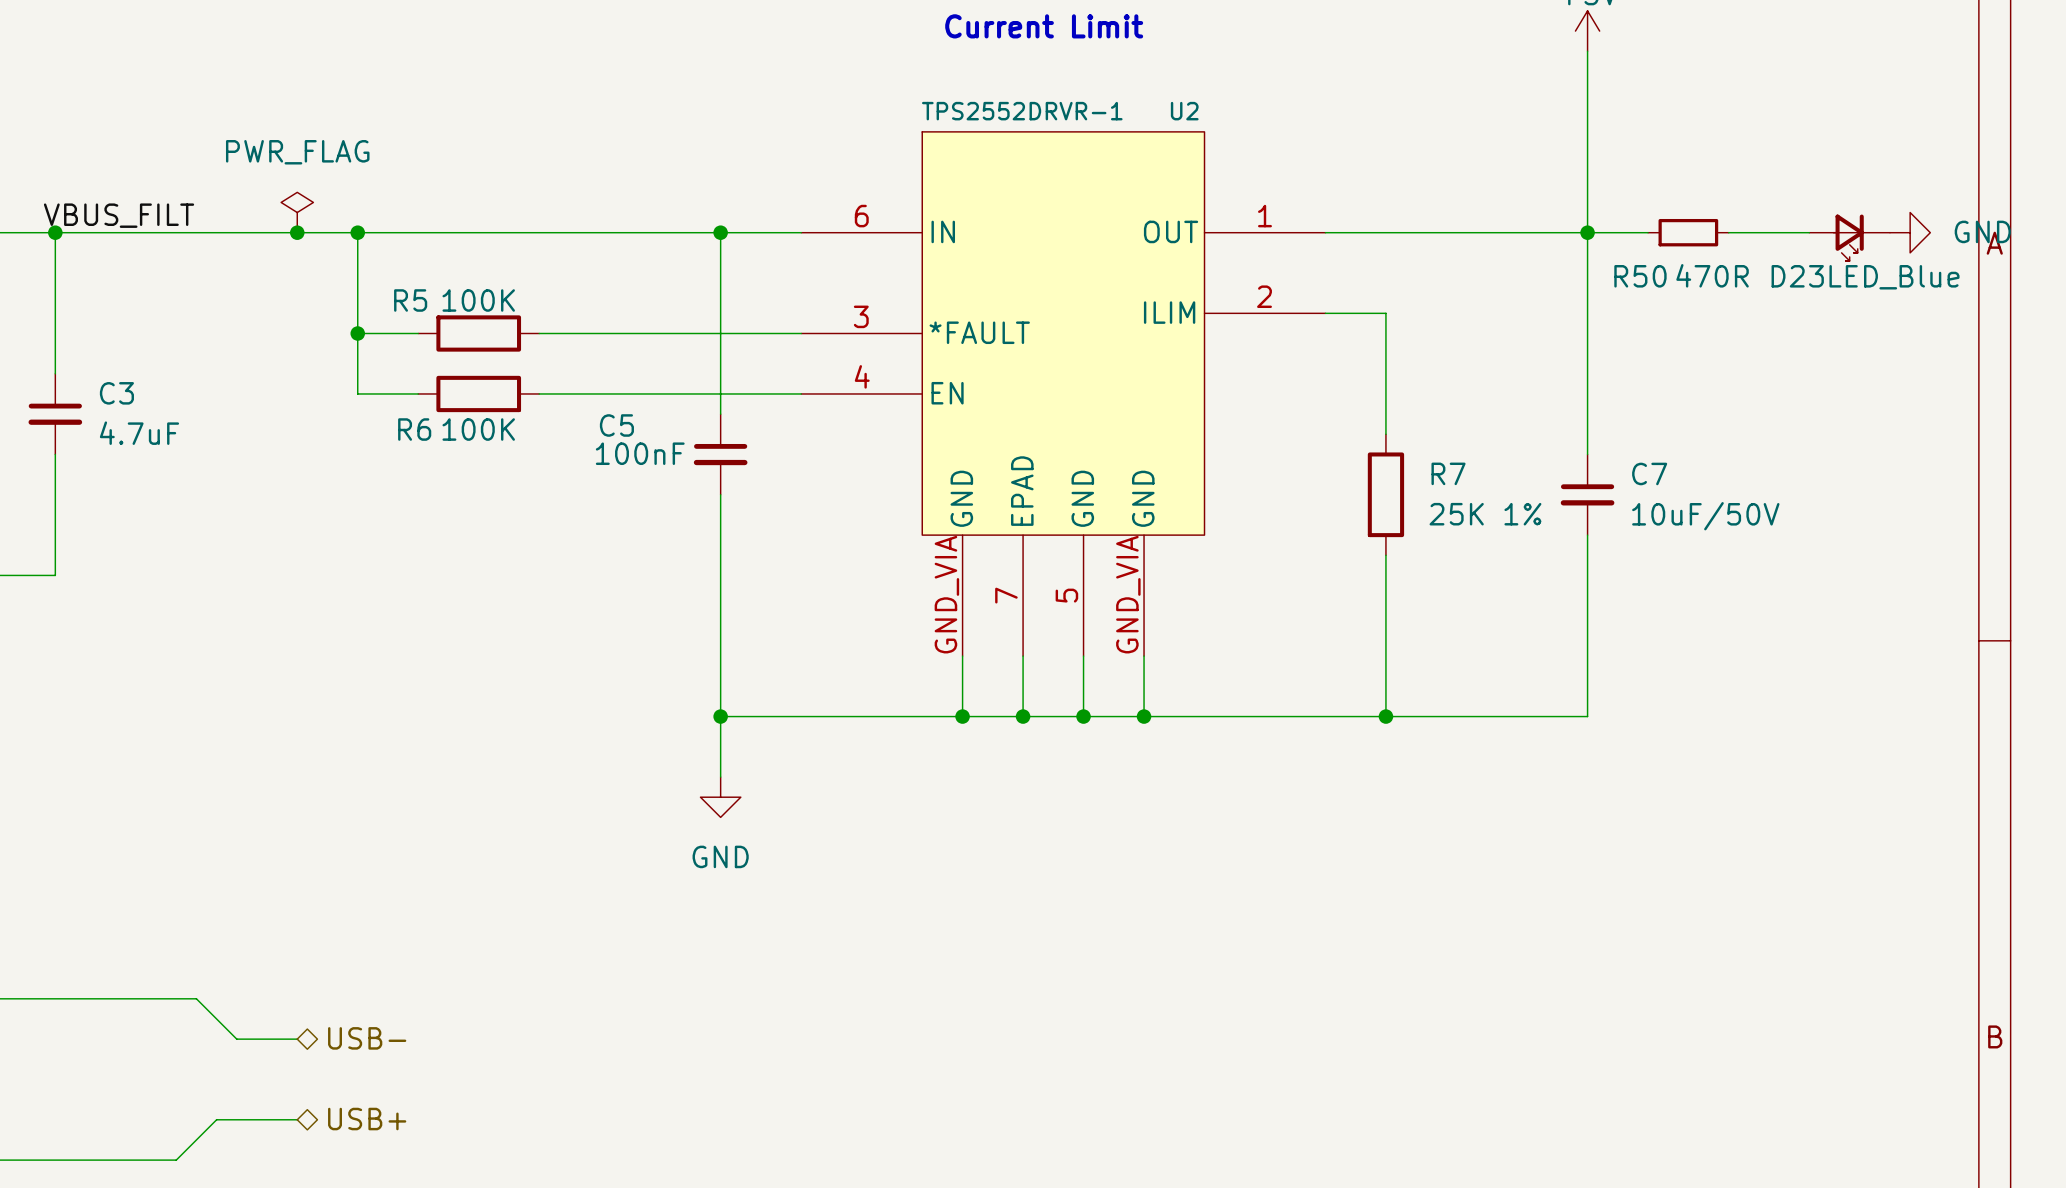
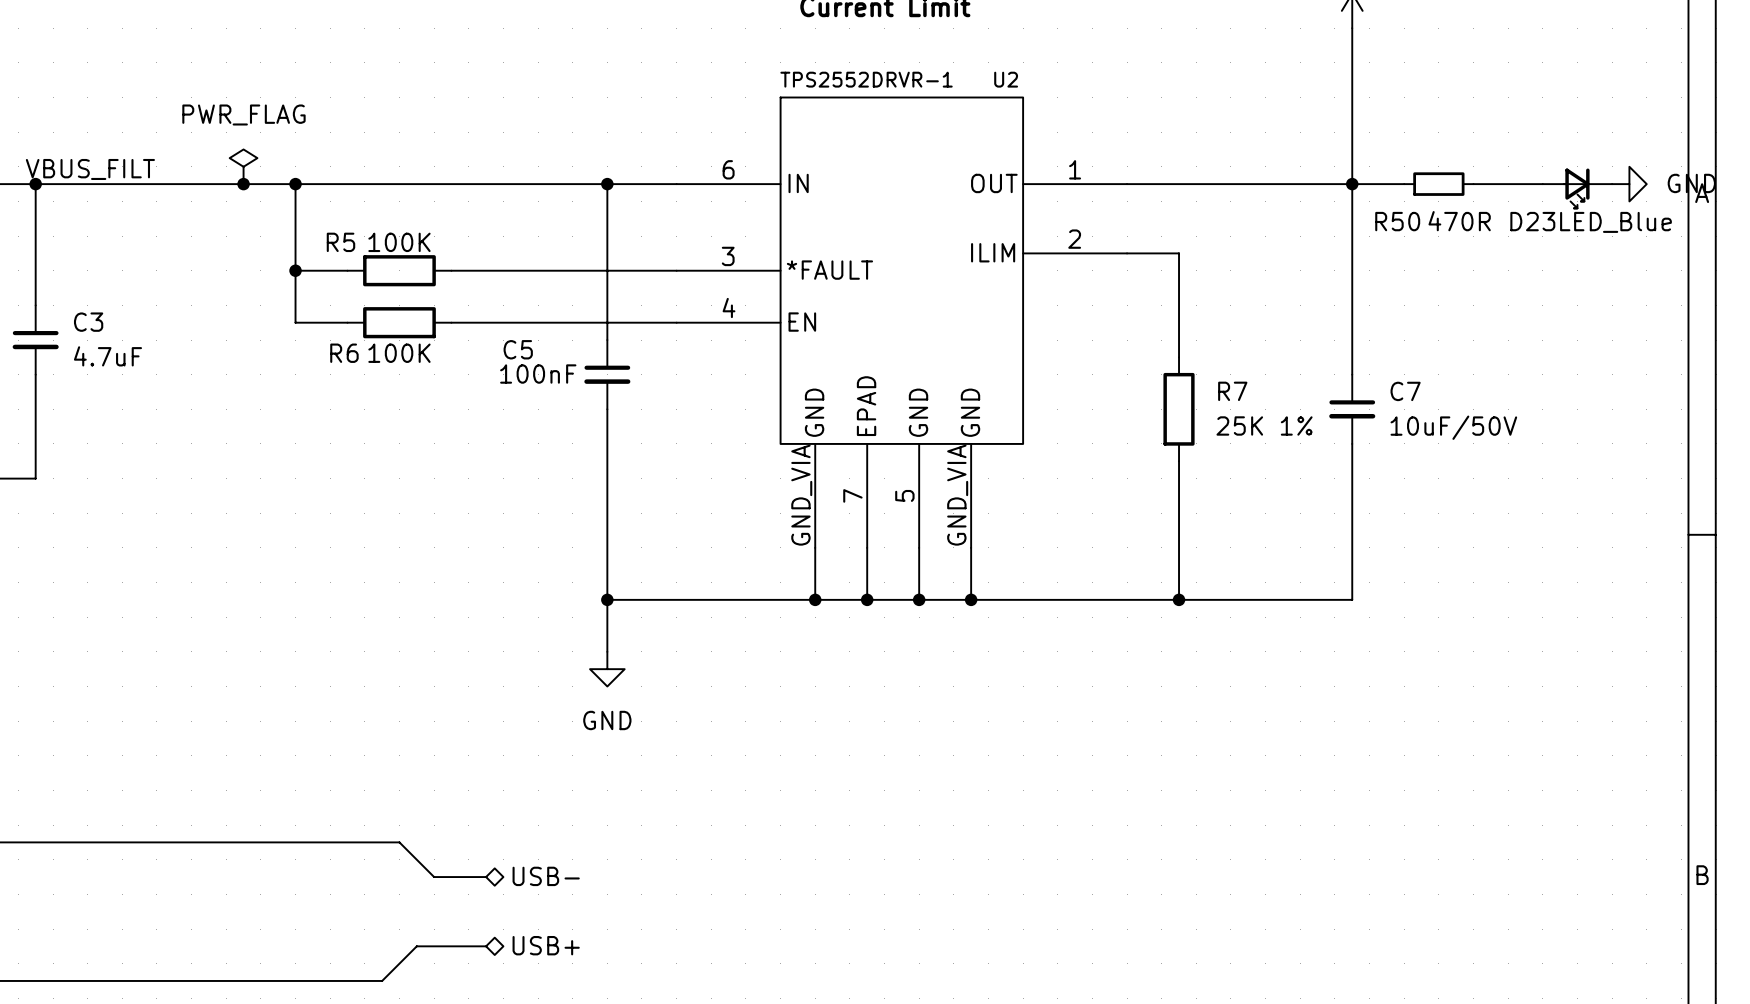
wire: (196, 998) (236, 1039) (297, 1039) -> (156, 842) (399, 842) (434, 877) (486, 877)
hierarchical label position: USB- (367, 1038) -> USB- (546, 876)
wire: (297, 1119) (216, 1119) (176, 1160) -> (486, 946) (416, 946) (382, 980) (139, 980)
hierarchical label position: USB+ (367, 1119) -> USB+ (546, 945)

